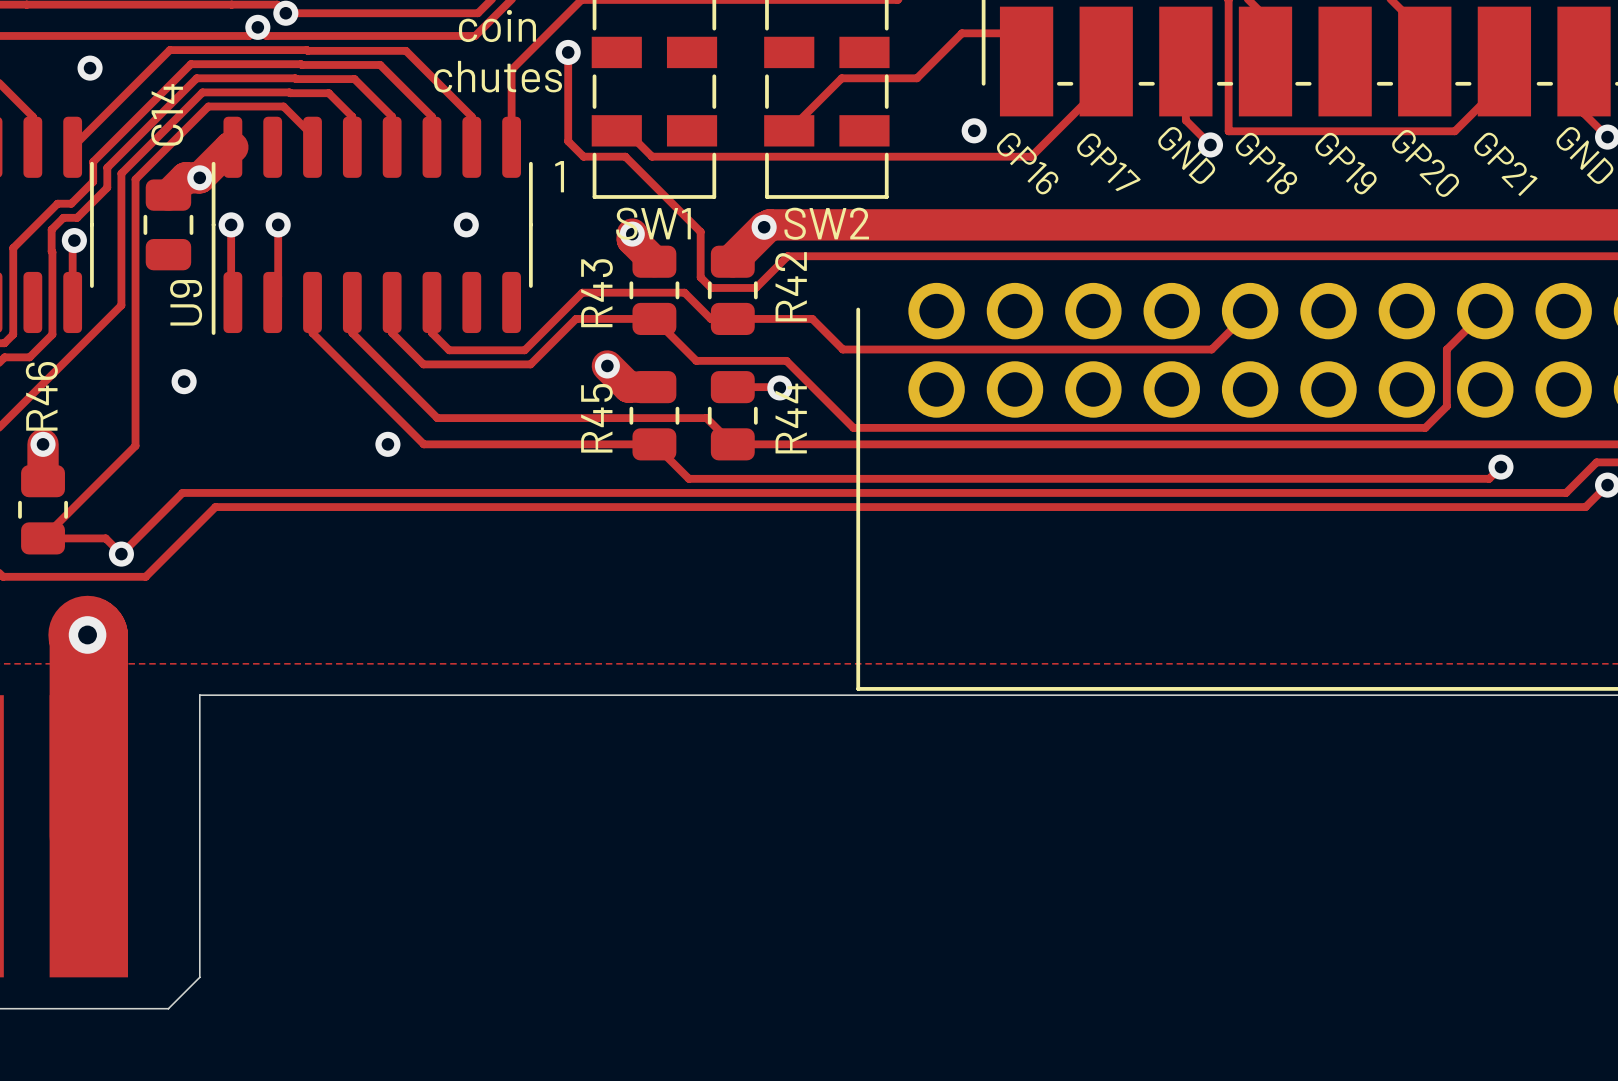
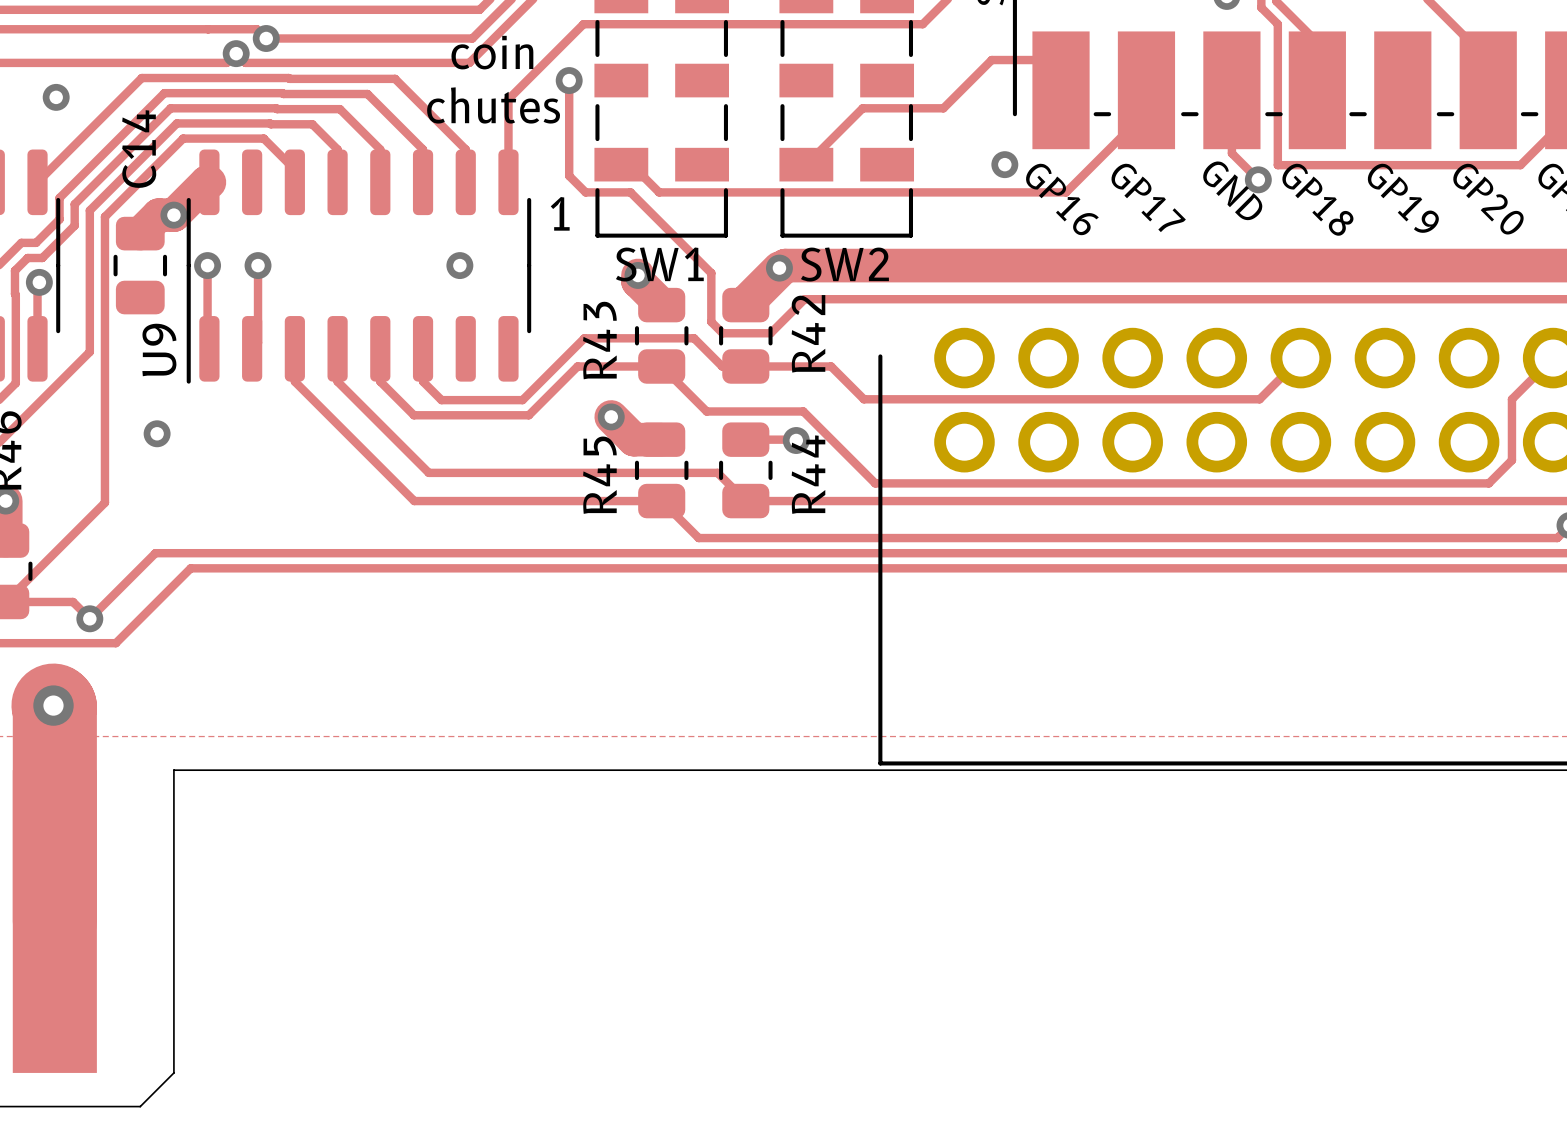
via: (387, 444) -> none

